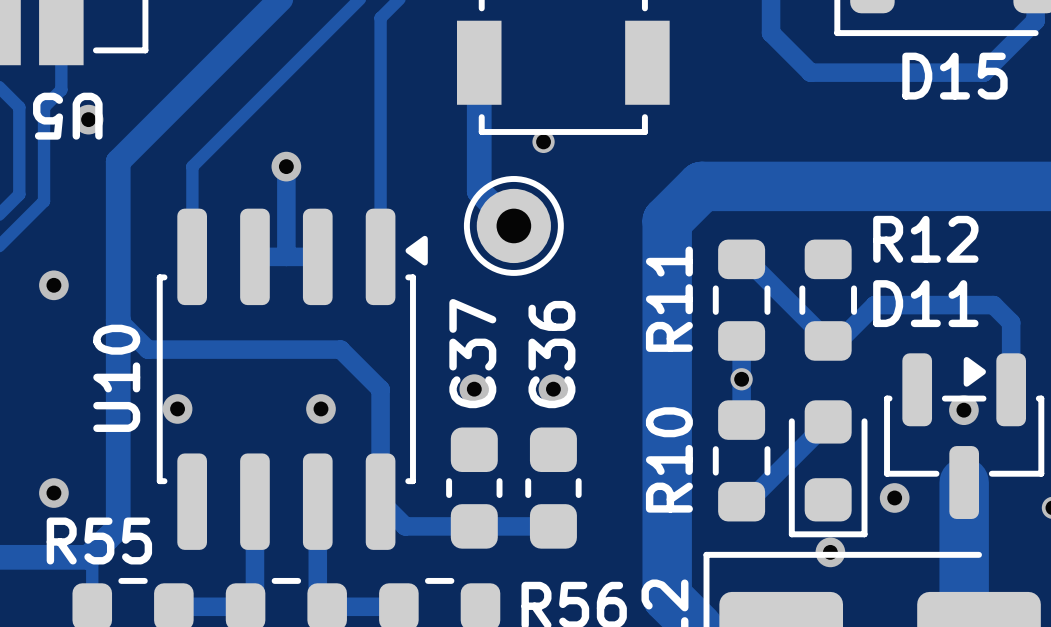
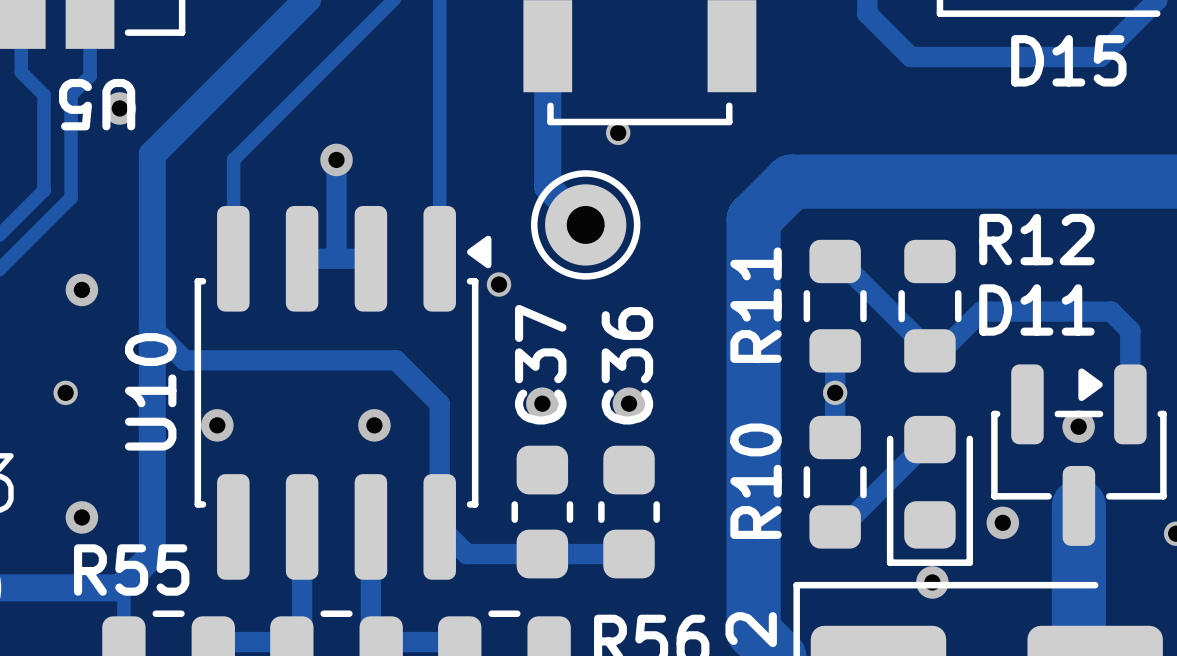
via: none -> (499, 284)
via: none -> (65, 392)

